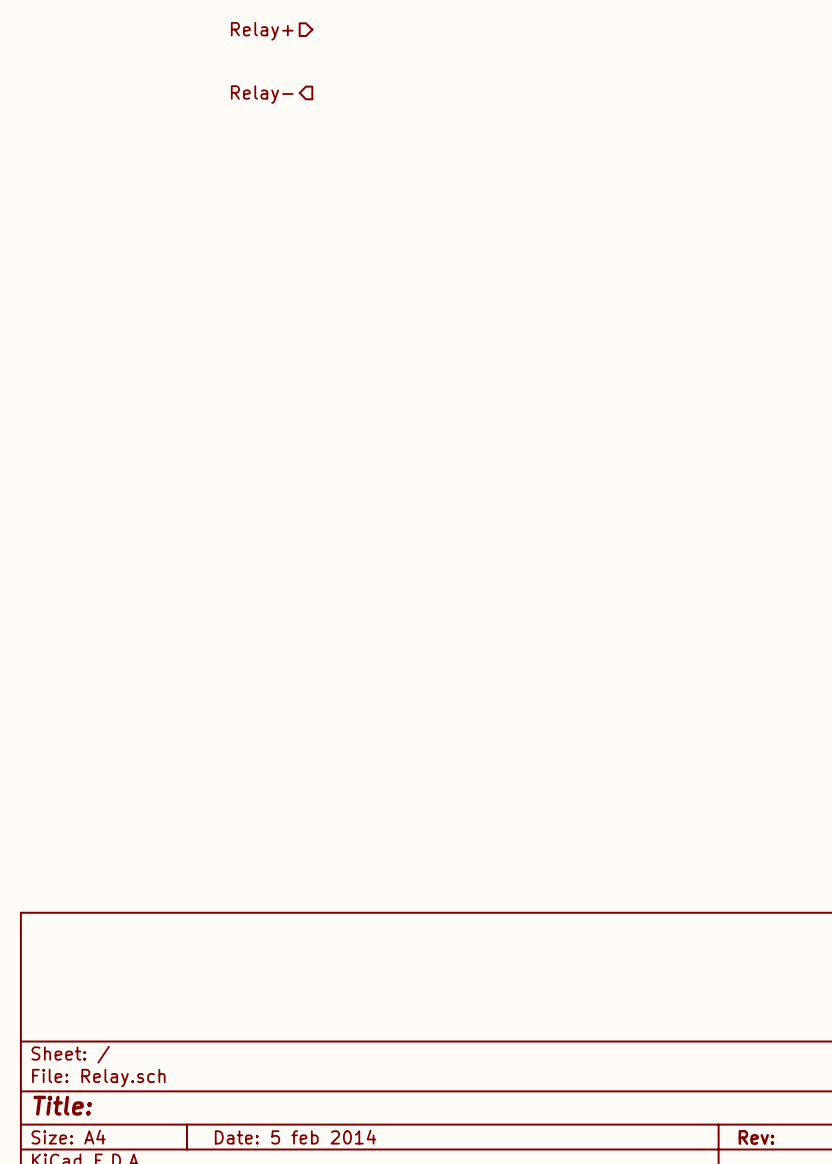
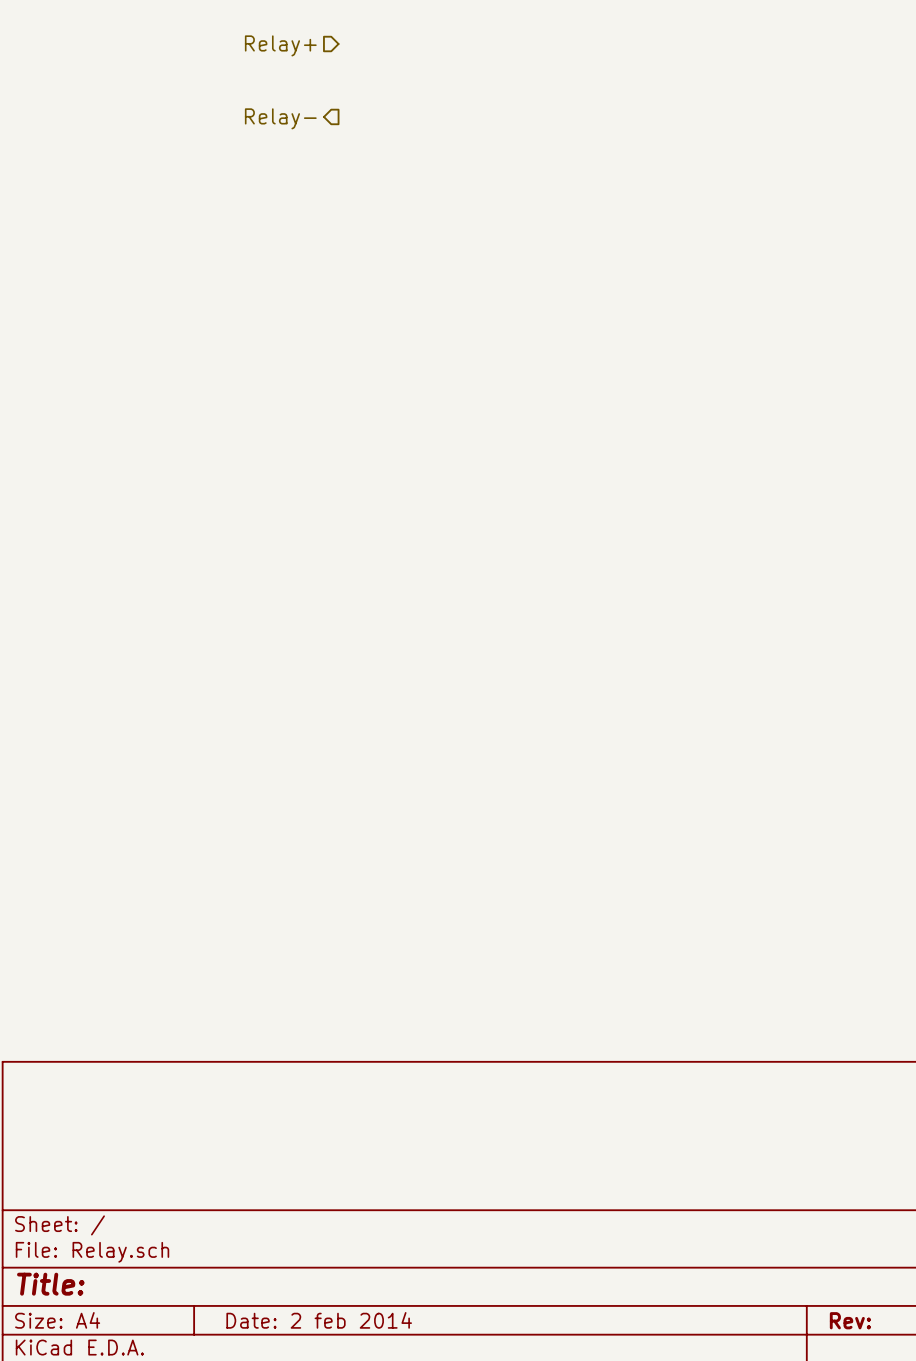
title block: Date: 5 feb 2014 (295, 1137) -> Date: 2 feb 2014 (319, 1320)

